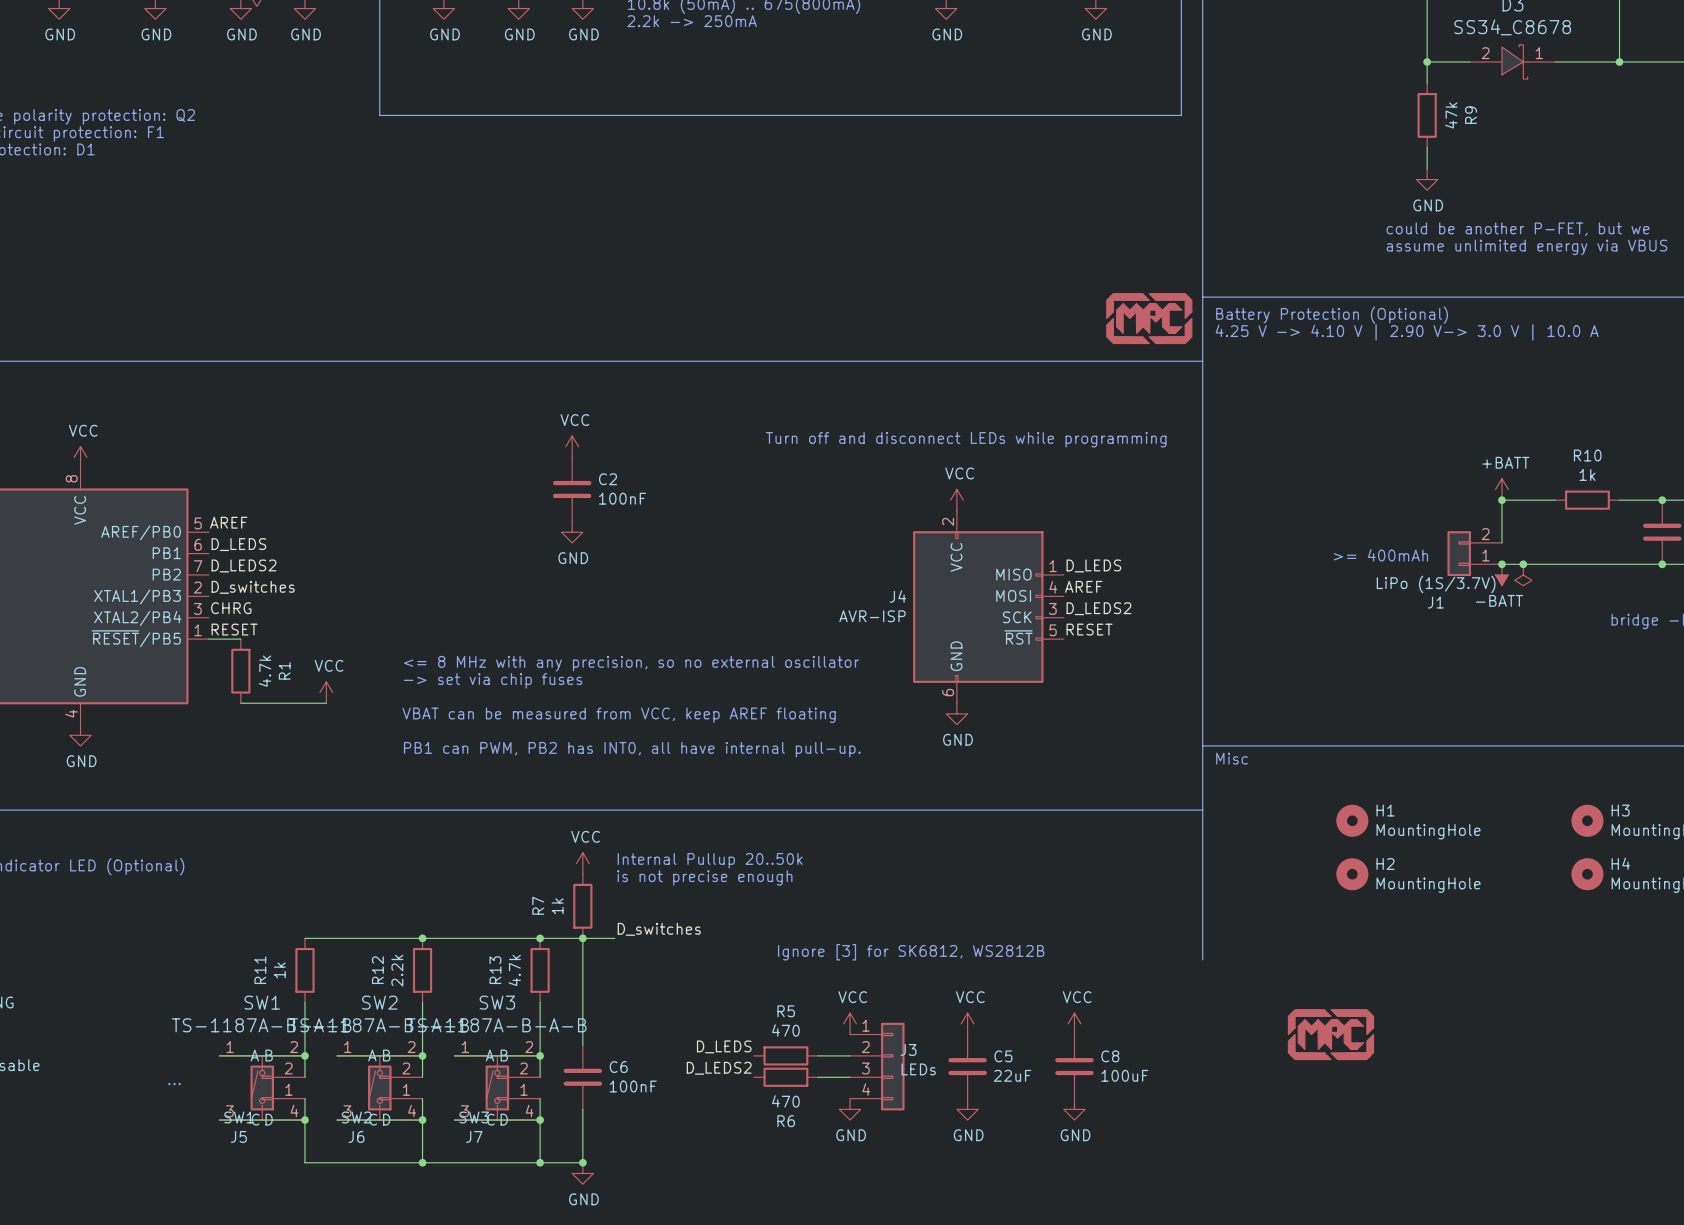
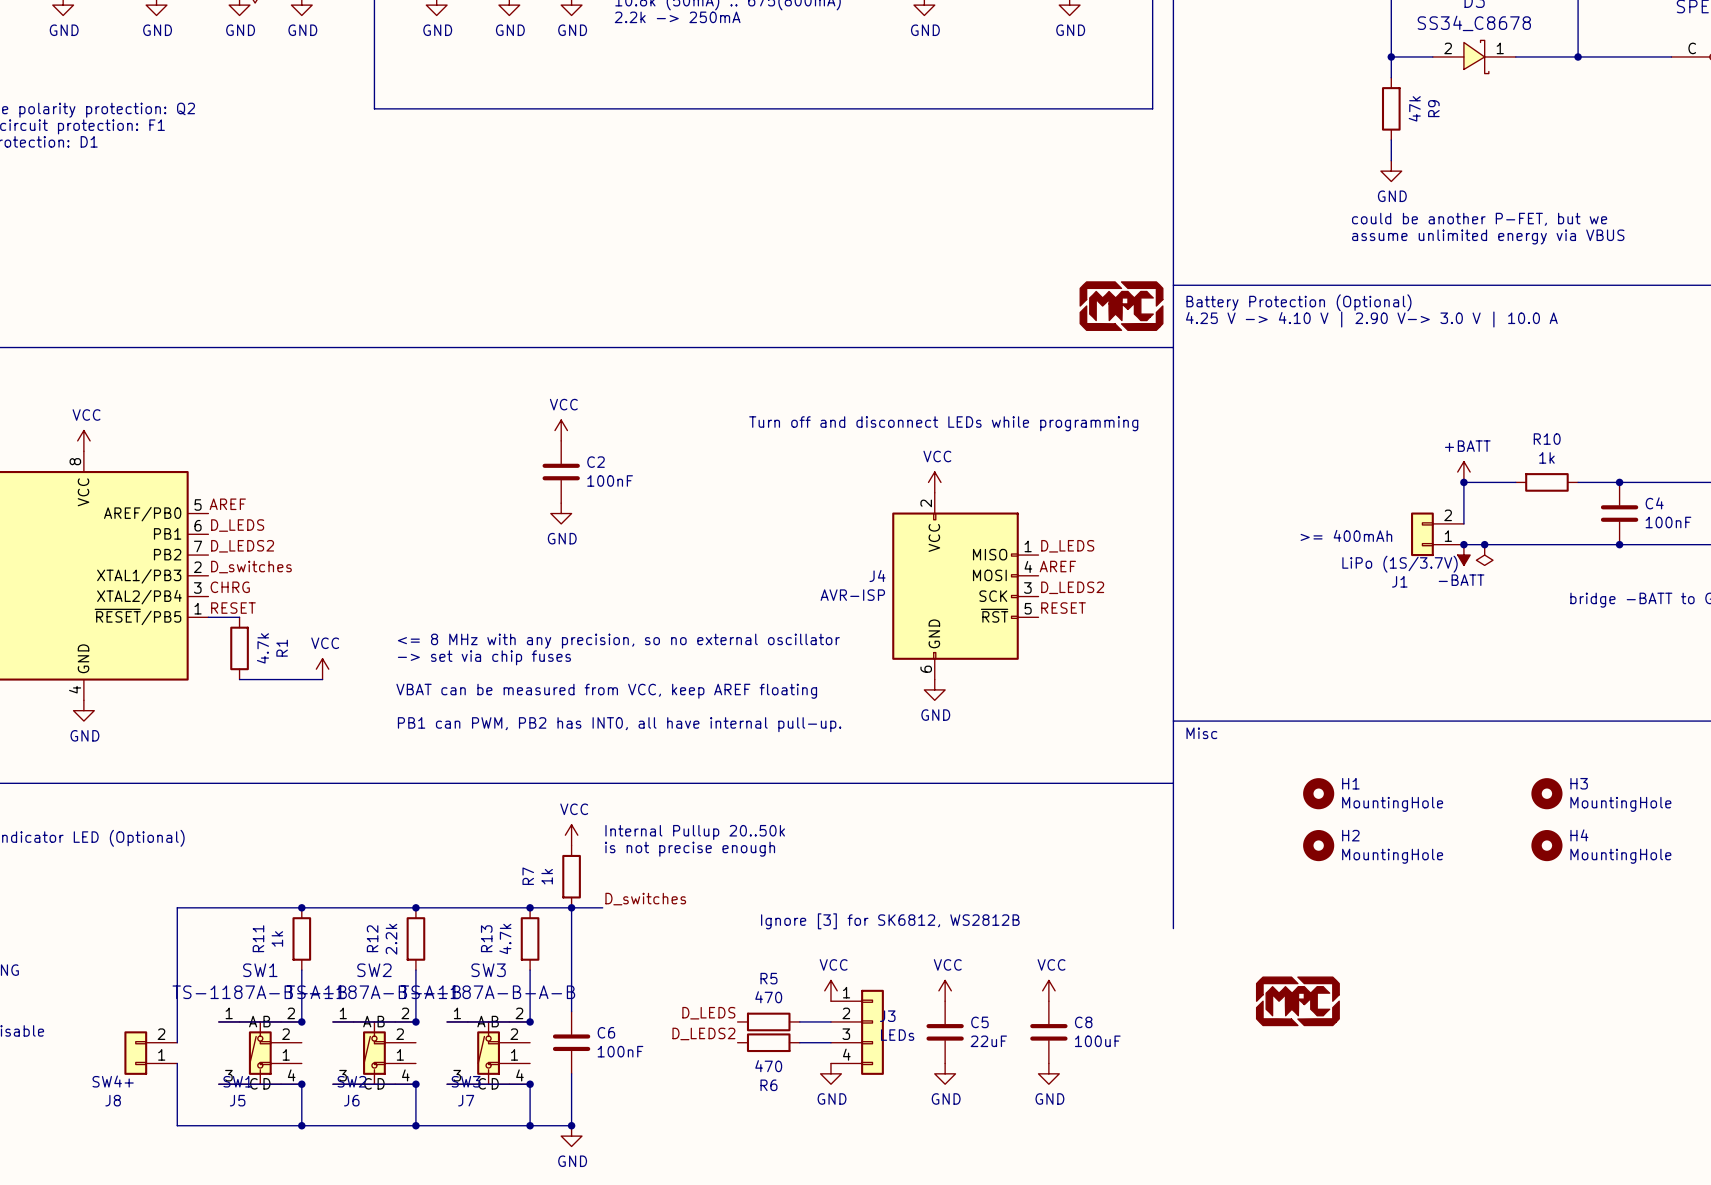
wire: none -> (301, 907) (177, 907) (177, 1042)
junction: none -> (301, 907)
wire: (304, 1055) (304, 1077) -> none
wire: (422, 1055) (422, 1077) -> none
wire: (540, 1055) (540, 1077) -> none
text: ... (174, 1084) -> none
J8: none -> SW4+ (150, 1053)
wire: none -> (177, 1063) (177, 1125) (301, 1125)
wire: (304, 1098) (304, 1120) -> none
wire: (422, 1098) (422, 1120) -> none
wire: (540, 1098) (540, 1120) -> none
junction: none -> (301, 1125)

